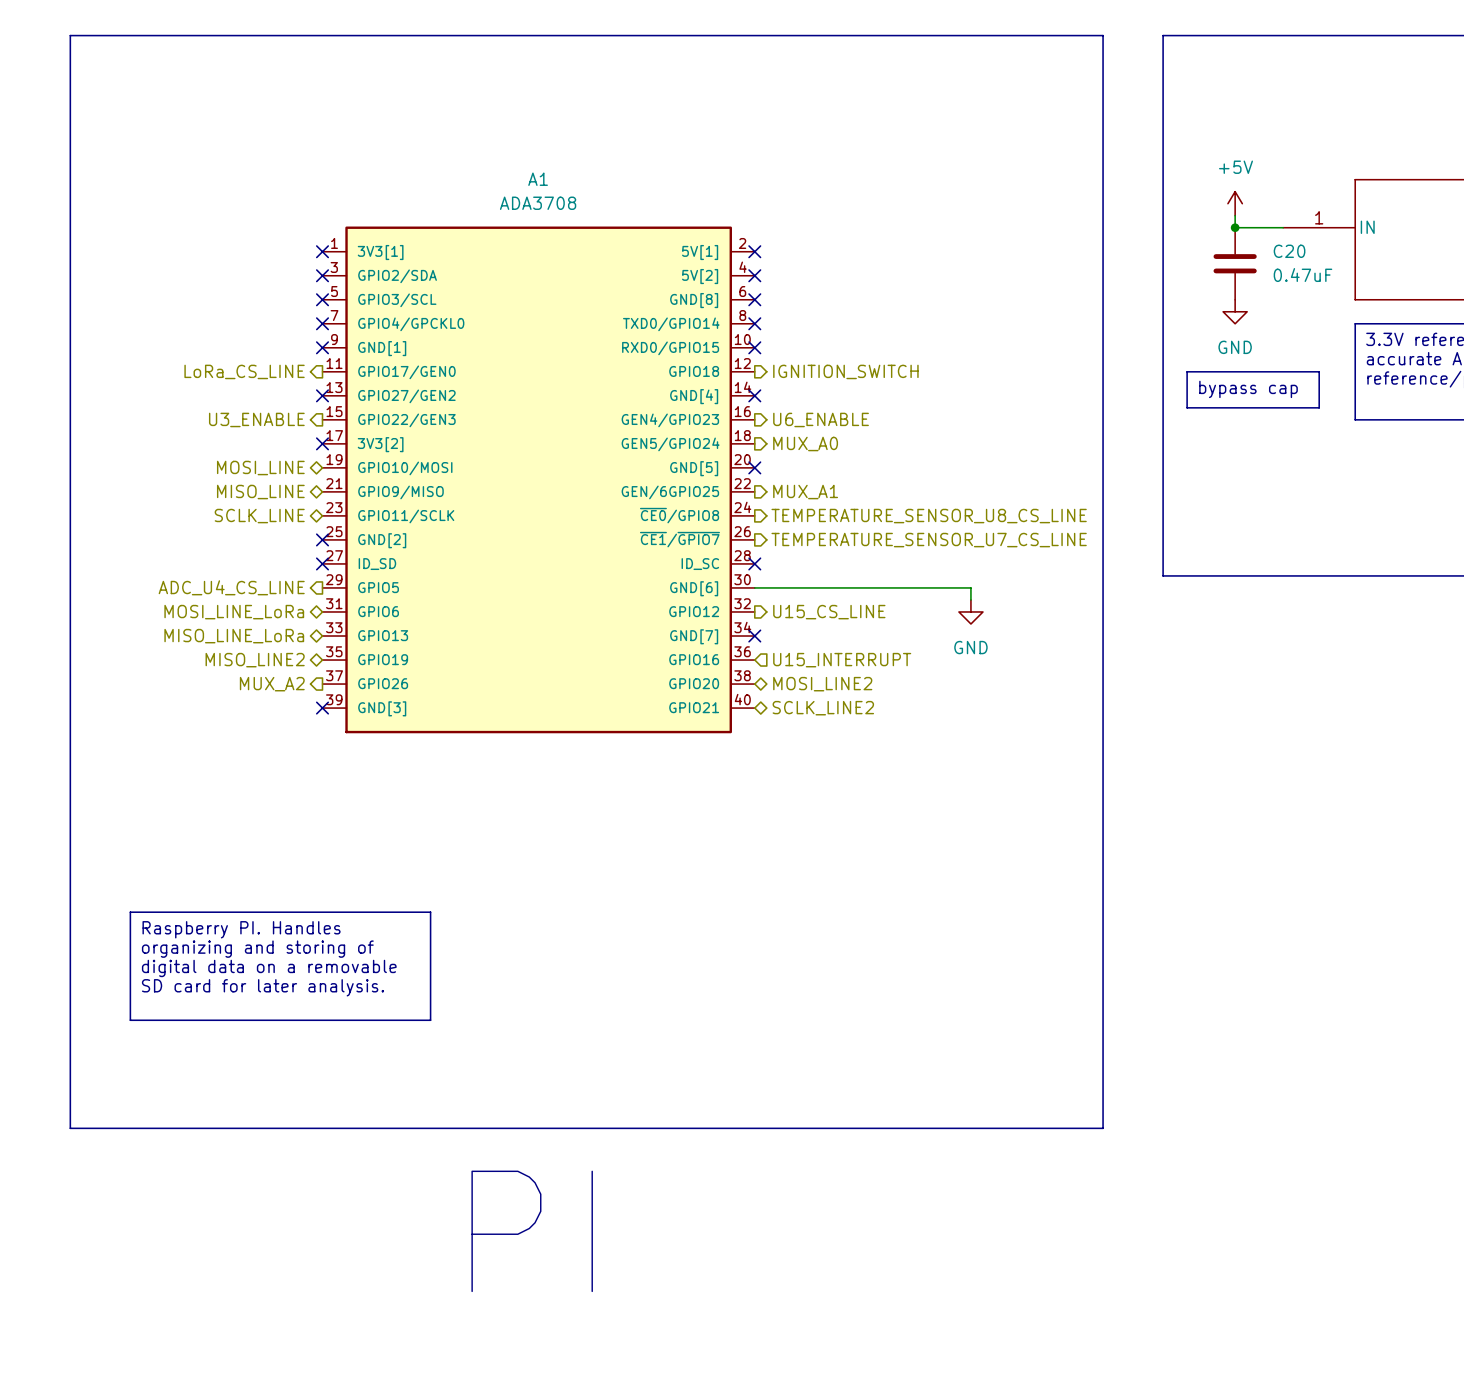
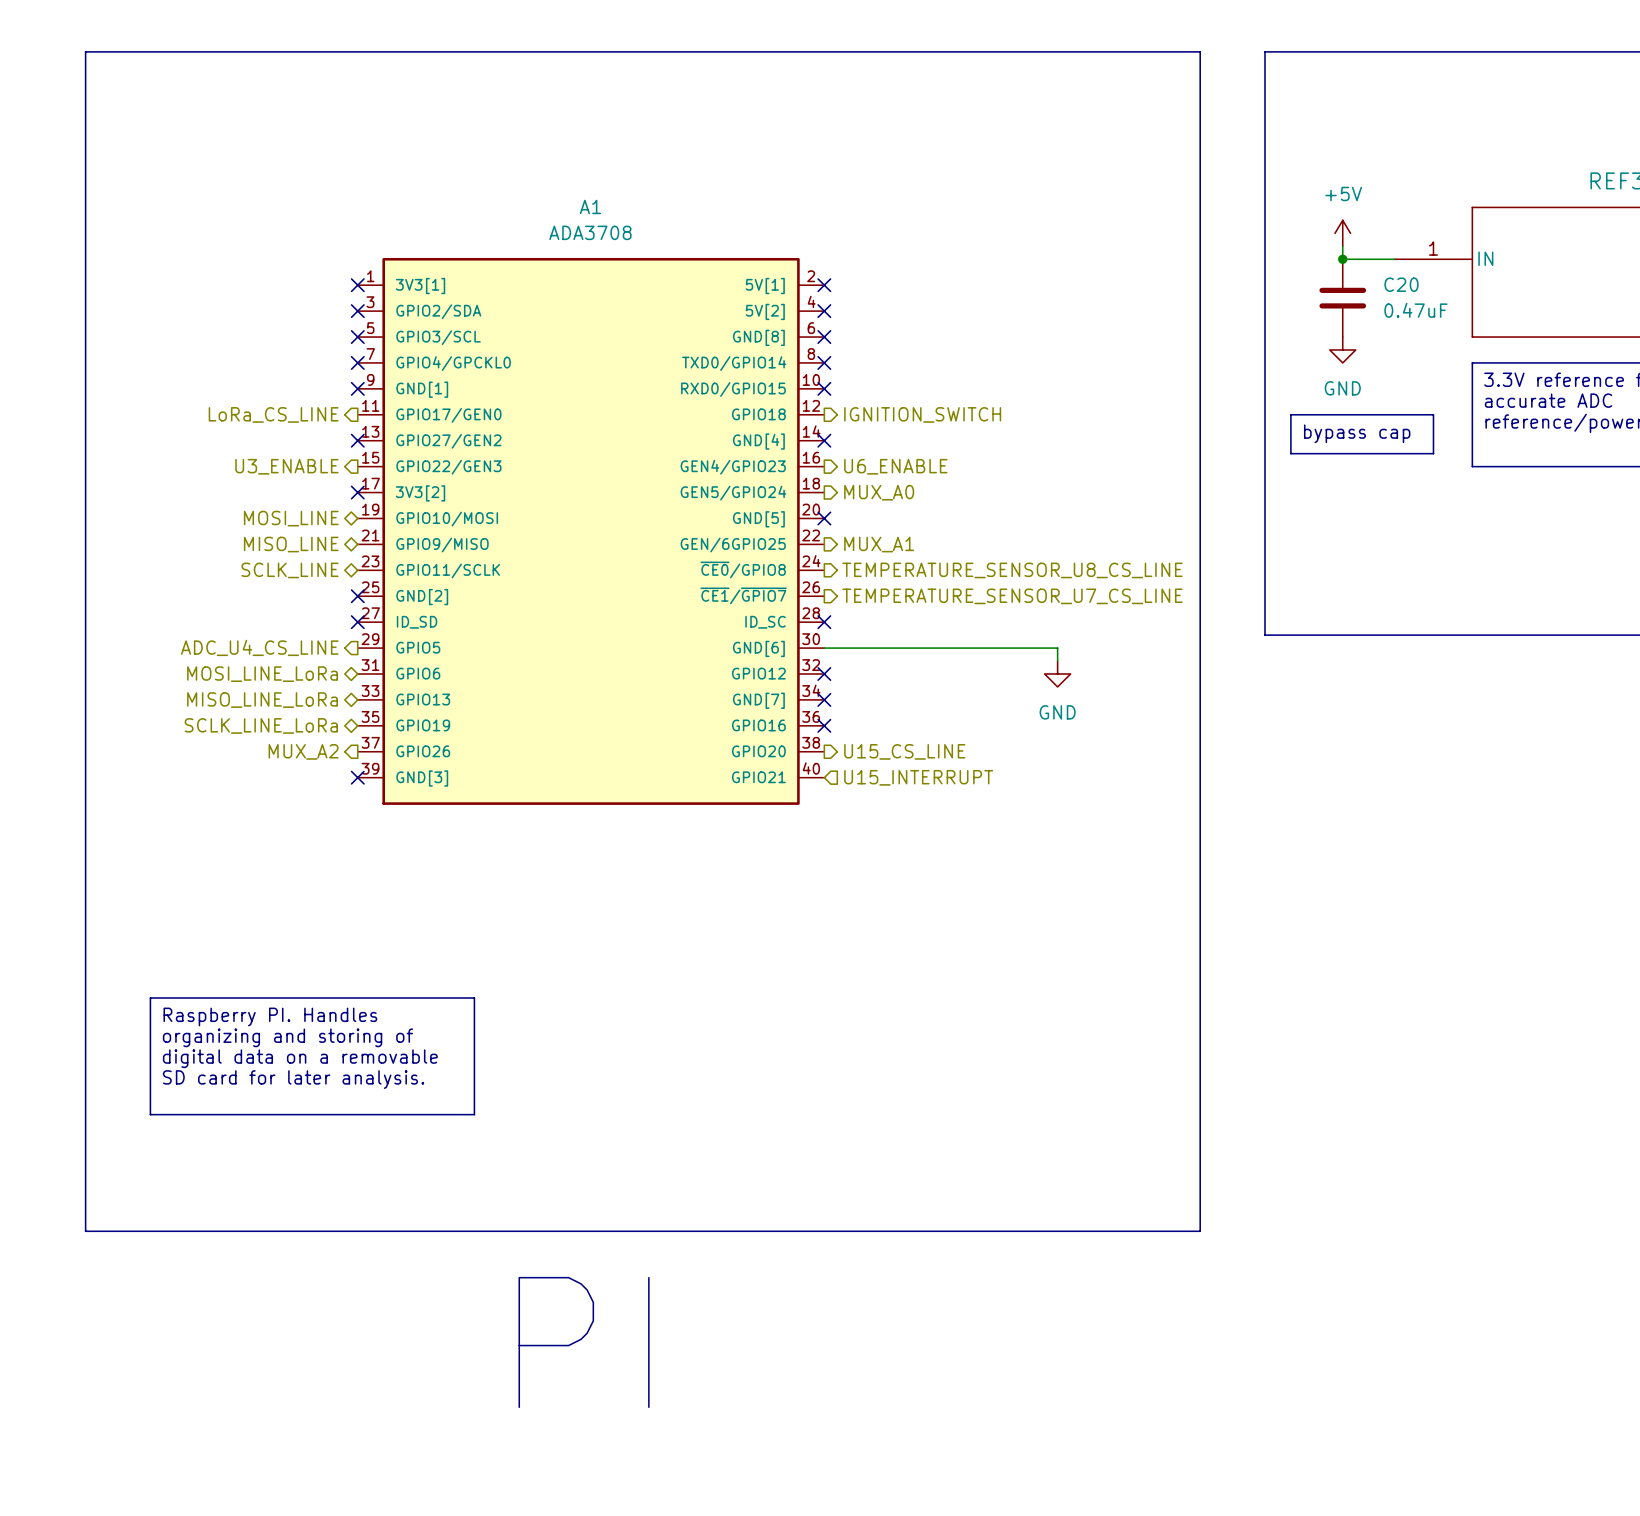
no-connect mark: none -> (824, 673)
hierarchical label: U15_CS_LINE (829, 612) -> none
hierarchical label: MISO_LINE2 (255, 660) -> SCLK_LINE_LoRa (261, 725)
no-connect mark: none -> (824, 725)
hierarchical label: U15_INTERRUPT (842, 660) -> none
hierarchical label shape: bidirectional (822, 684) -> output (904, 751)
hierarchical label: MOSI_LINE2 (822, 684) -> U15_CS_LINE (904, 751)
hierarchical label shape: bidirectional (823, 708) -> input (918, 777)
hierarchical label: SCLK_LINE2 (823, 708) -> U15_INTERRUPT (918, 777)

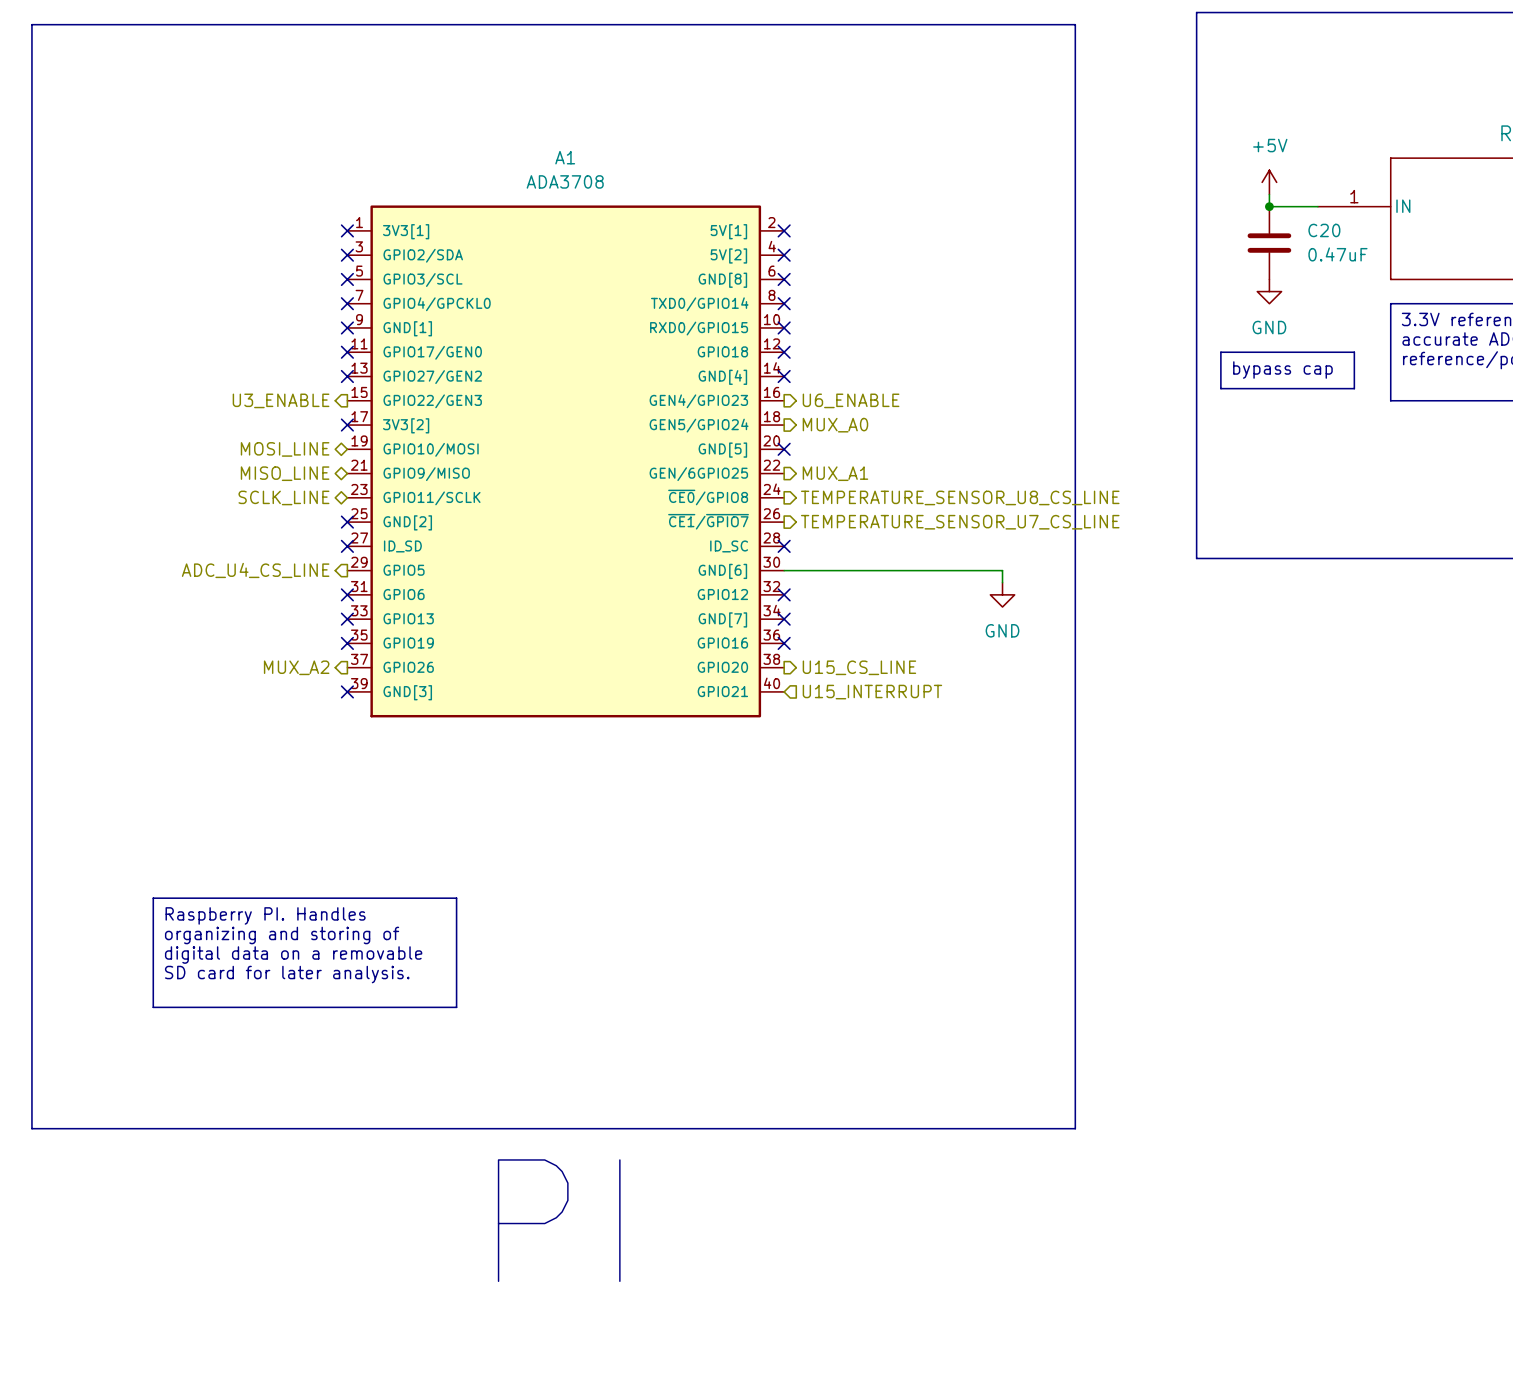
line: (85, 51) (1200, 51) (1200, 1231) (85, 1231) (85, 51) -> (31, 24) (1075, 24) (1075, 1128) (31, 1128) (31, 24)
hierarchical label: LoRa_CS_LINE (273, 414) -> none
no-connect mark: none -> (347, 352)
no-connect mark: none -> (784, 352)
hierarchical label: IGNITION_SWITCH (922, 414) -> none
no-connect mark: none -> (347, 594)
hierarchical label: MOSI_LINE_LoRa (262, 674) -> none
no-connect mark: none -> (347, 619)
hierarchical label: MISO_LINE_LoRa (262, 700) -> none
hierarchical label: SCLK_LINE_LoRa (261, 725) -> none
no-connect mark: none -> (347, 643)

